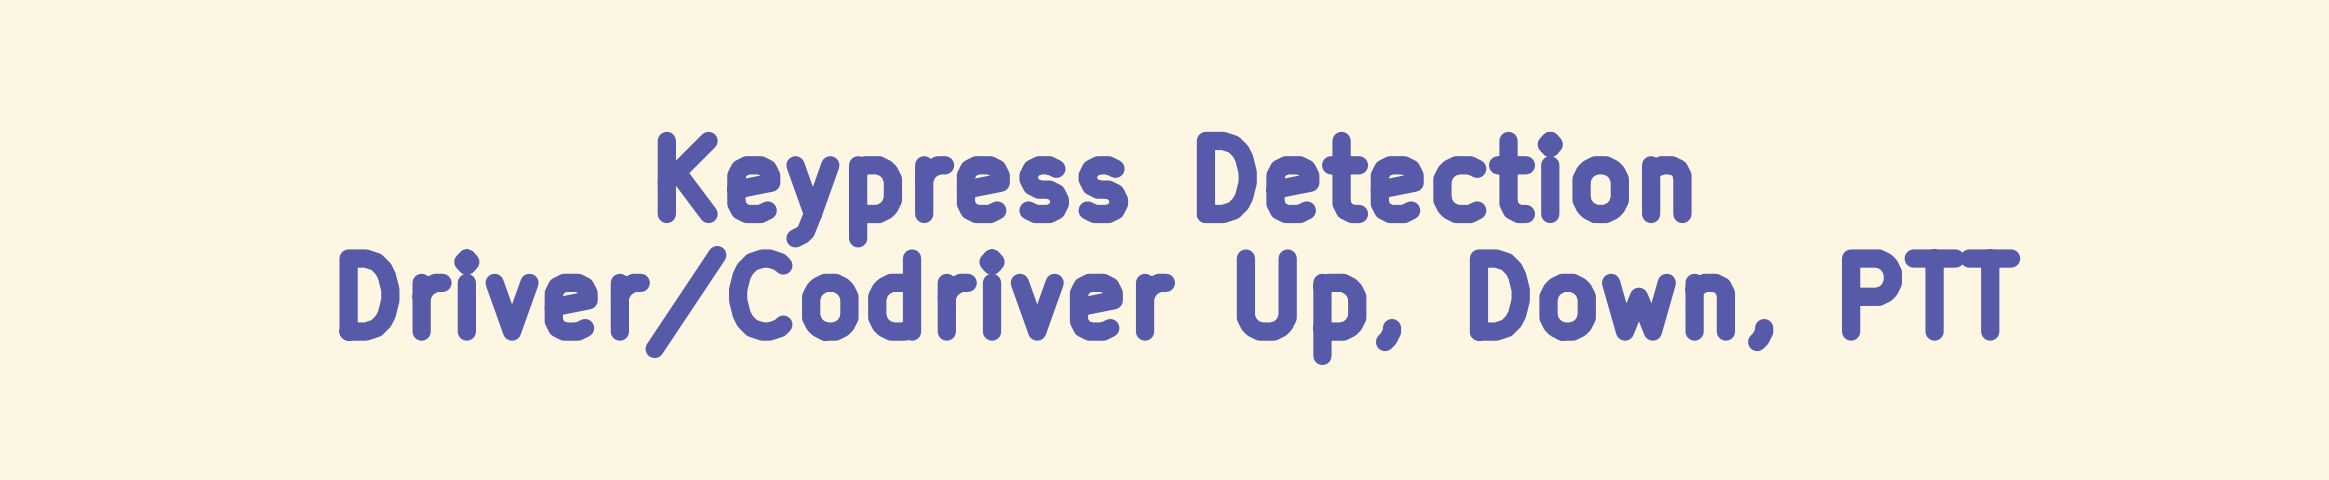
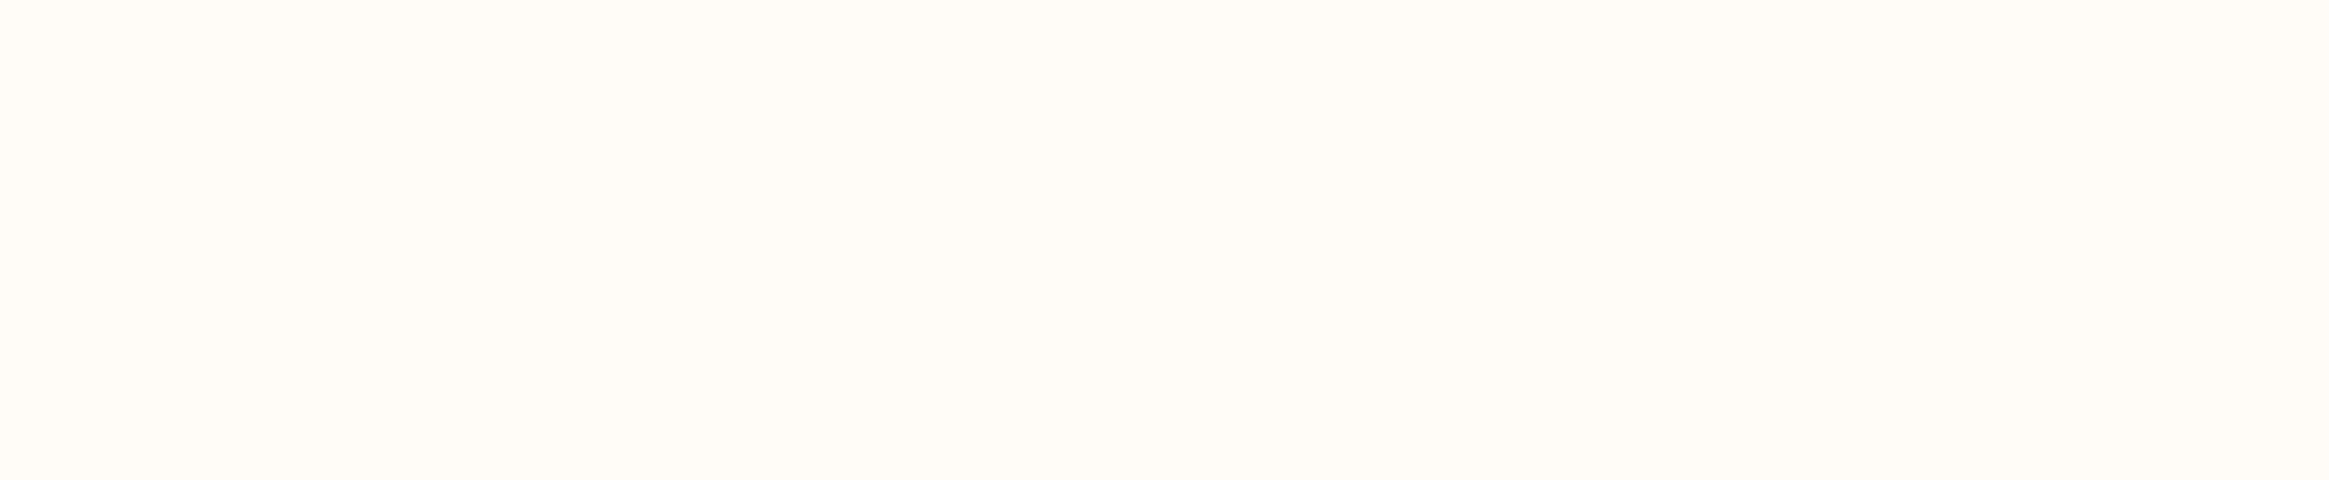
text: Keypress Detection (1174, 189) -> none
text: Driver/Codriver Up, Down, PTT (1179, 305) -> none

